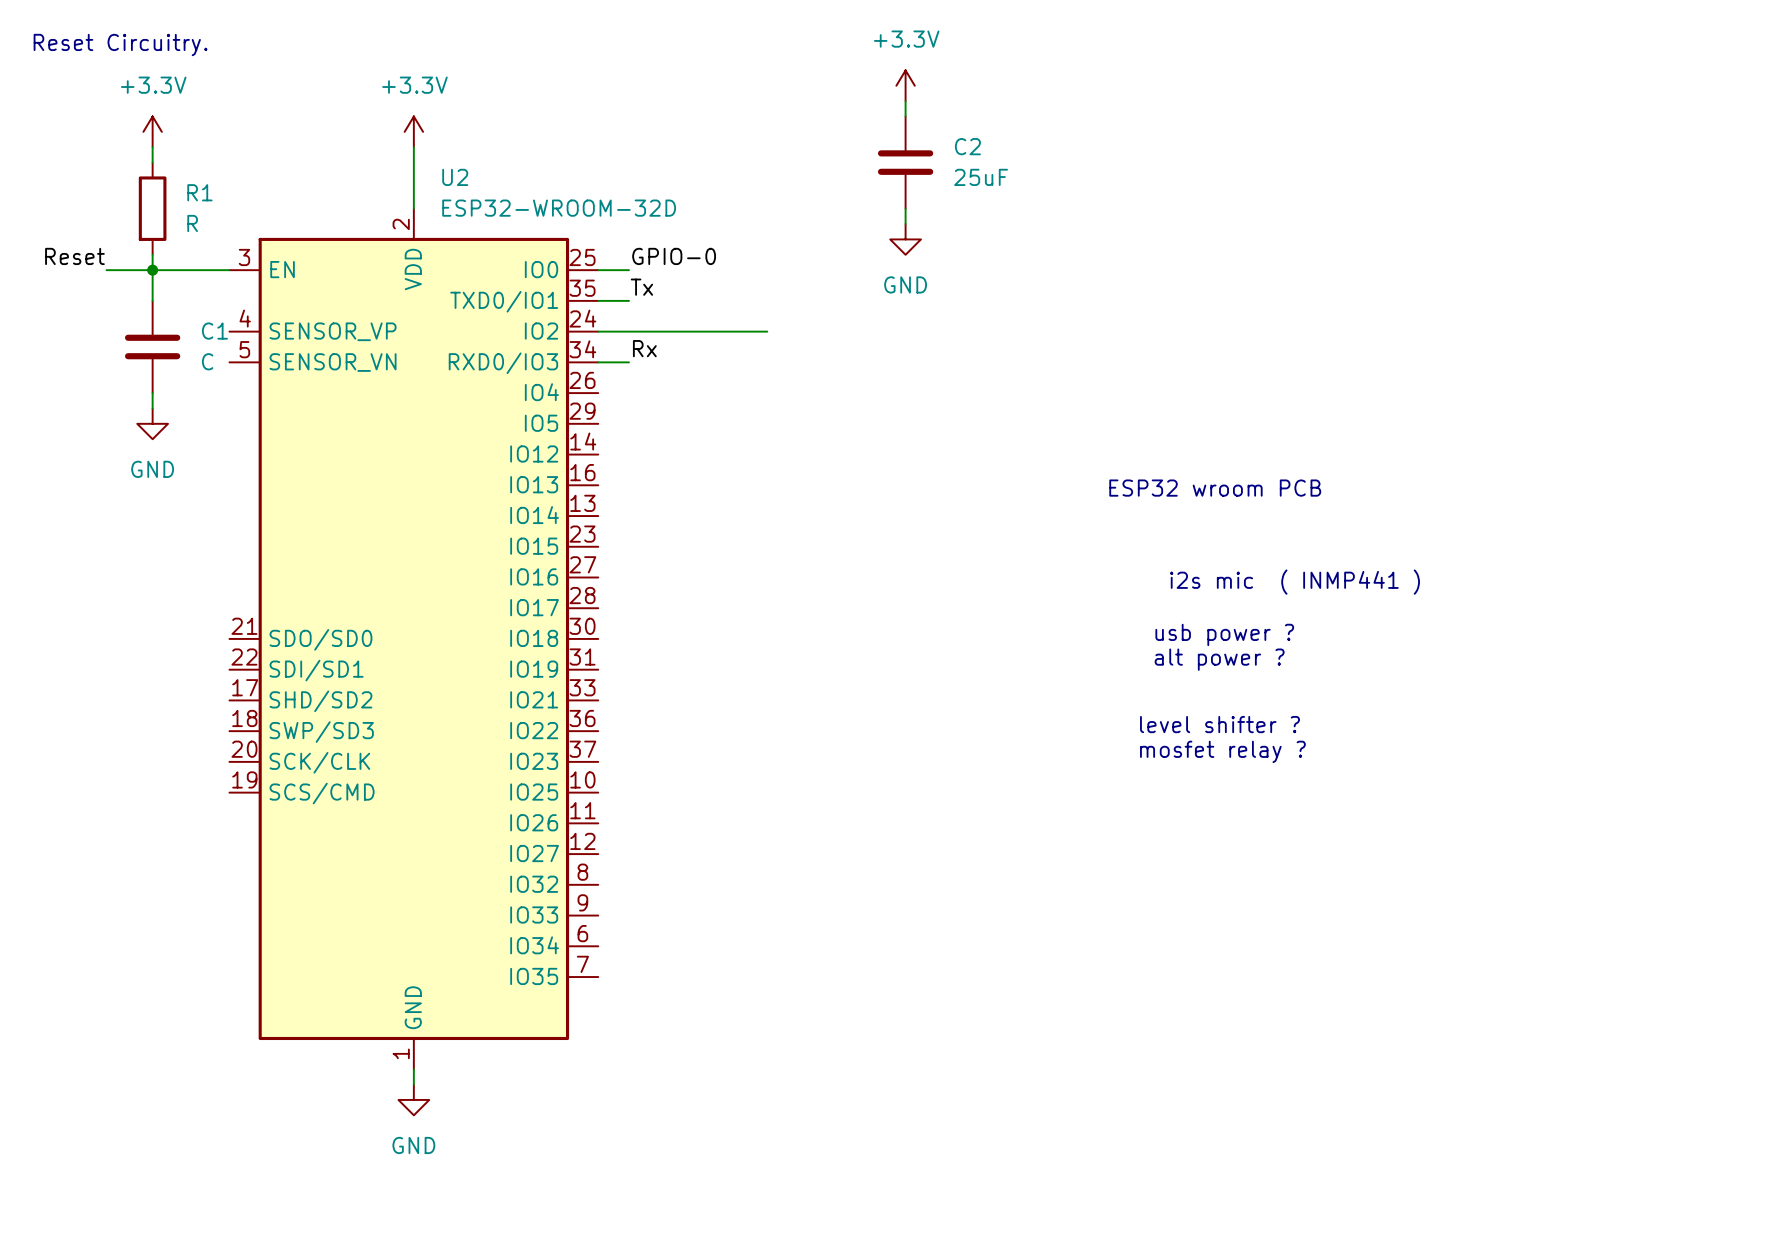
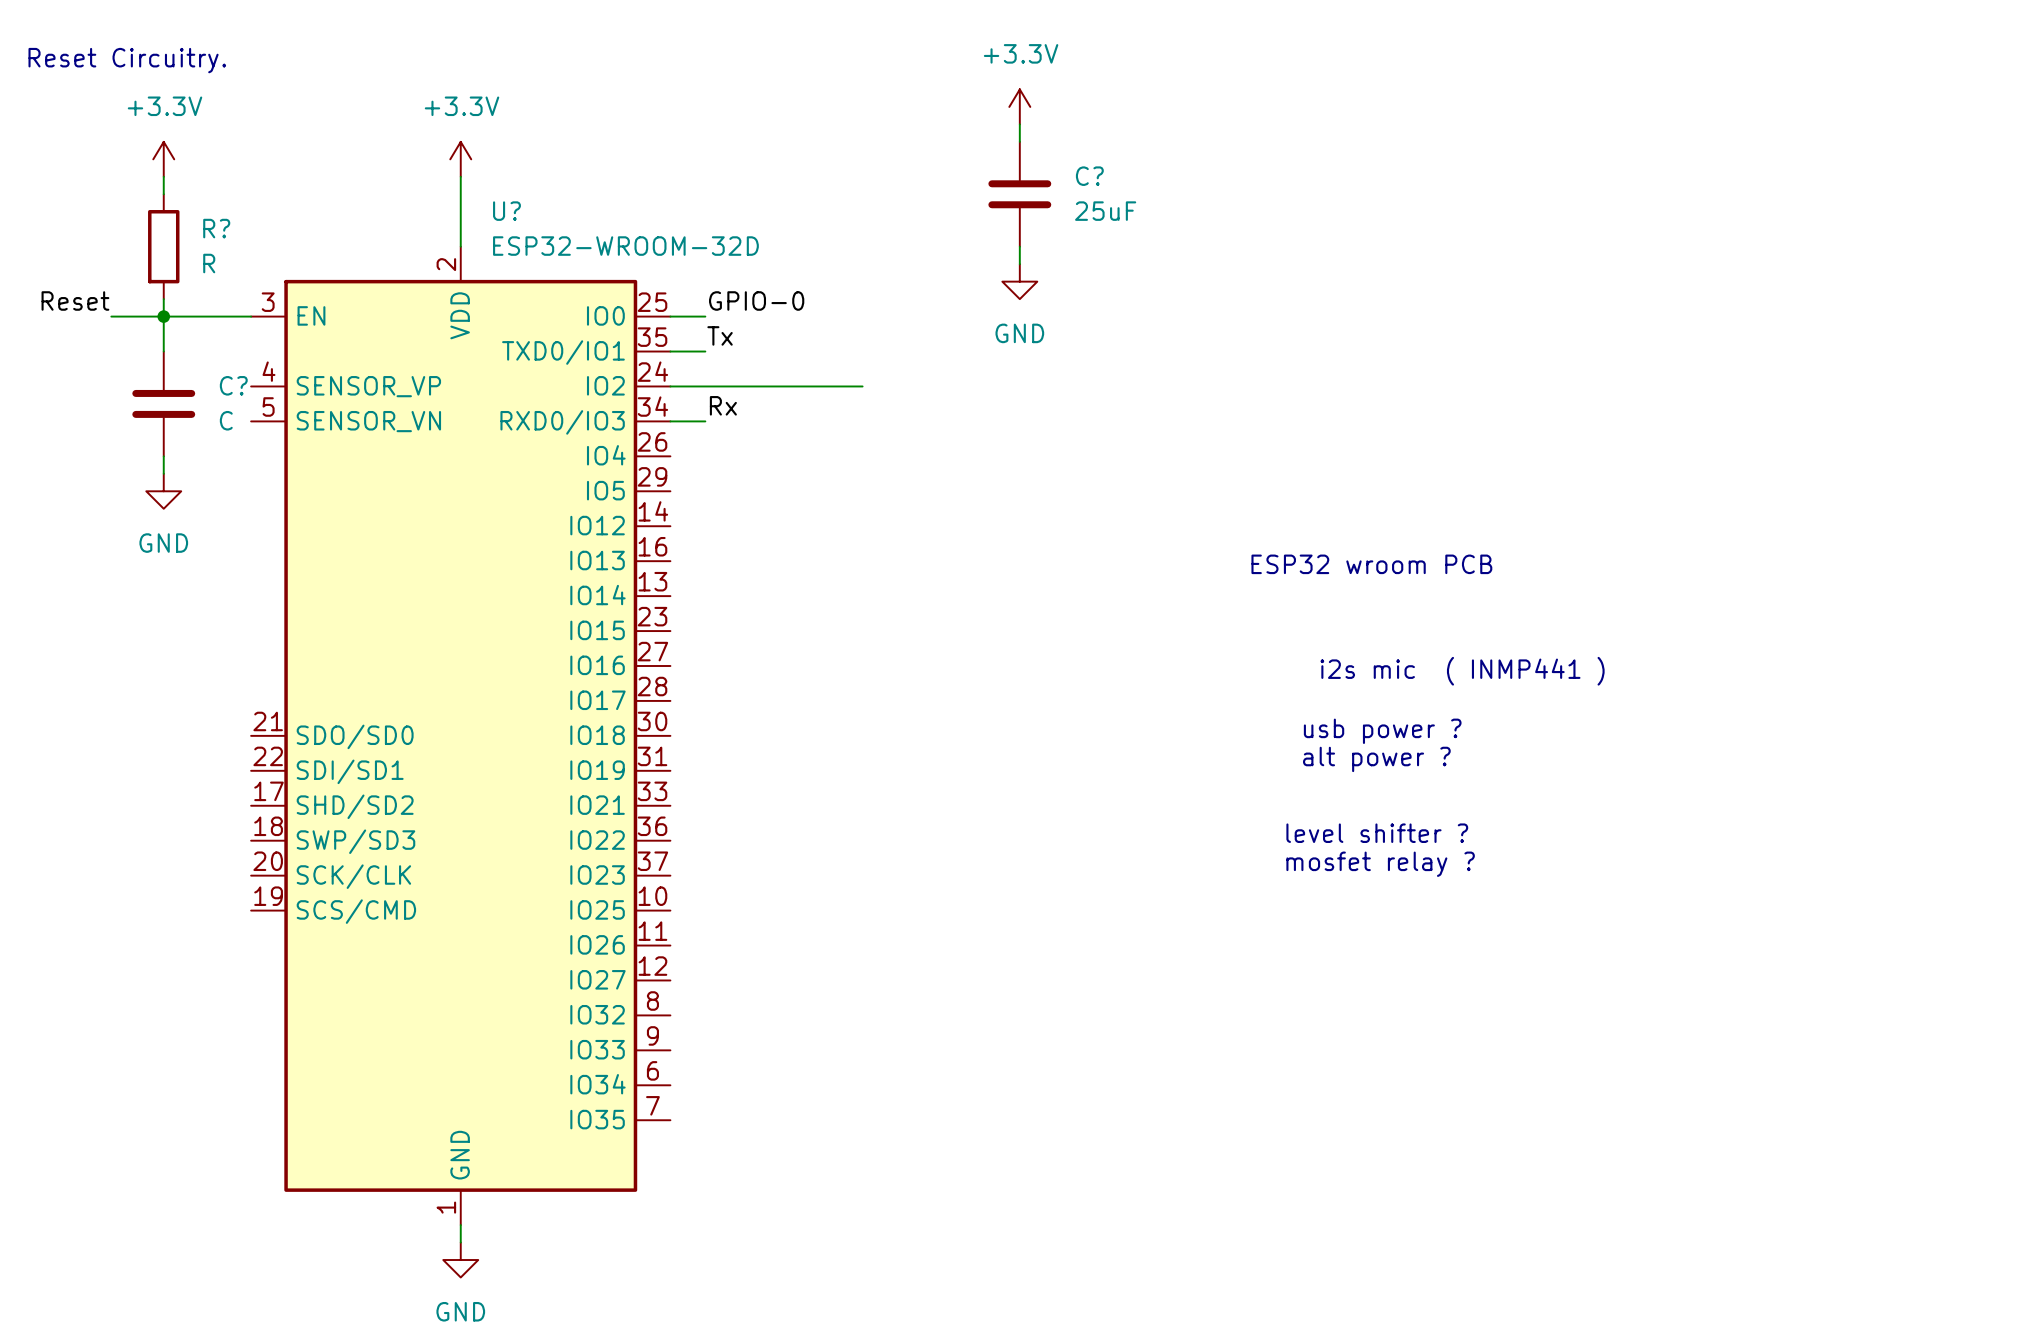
C2 name: C2 (967, 146) -> C? (1089, 176)
U2 name: U2 (455, 177) -> U? (506, 211)
R1 name: R1 (199, 192) -> R? (216, 228)
C1 name: C1 (214, 331) -> C? (233, 385)

